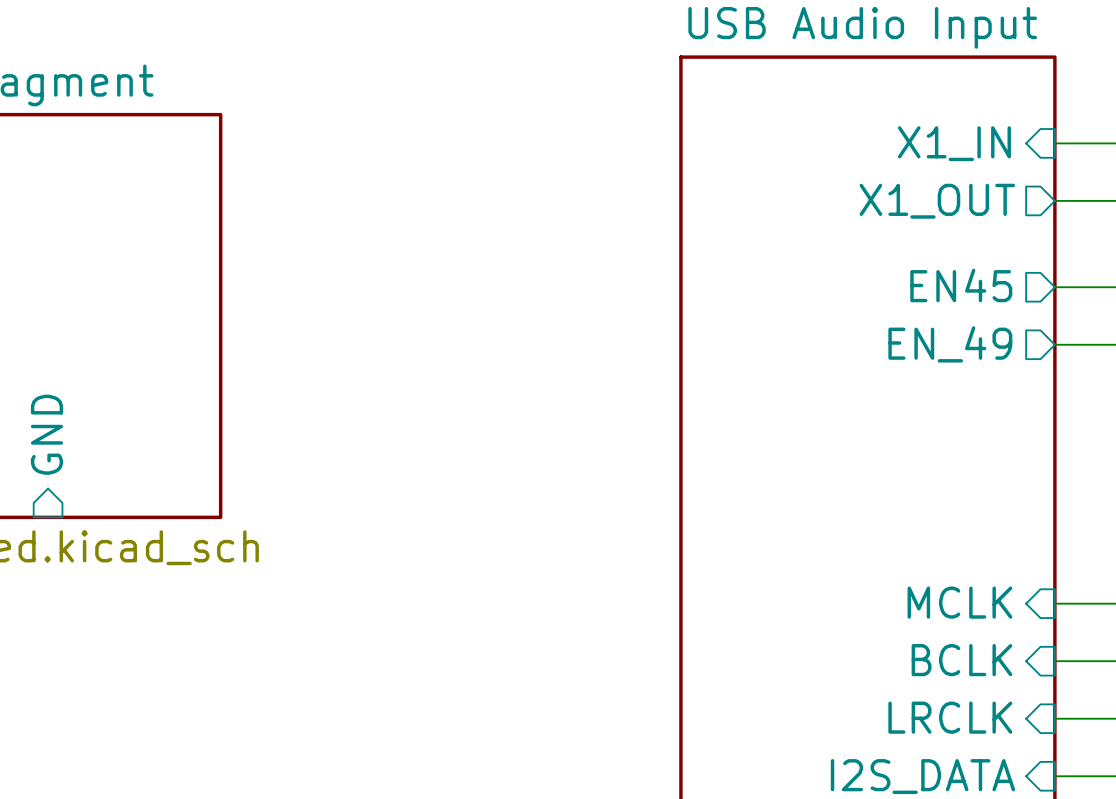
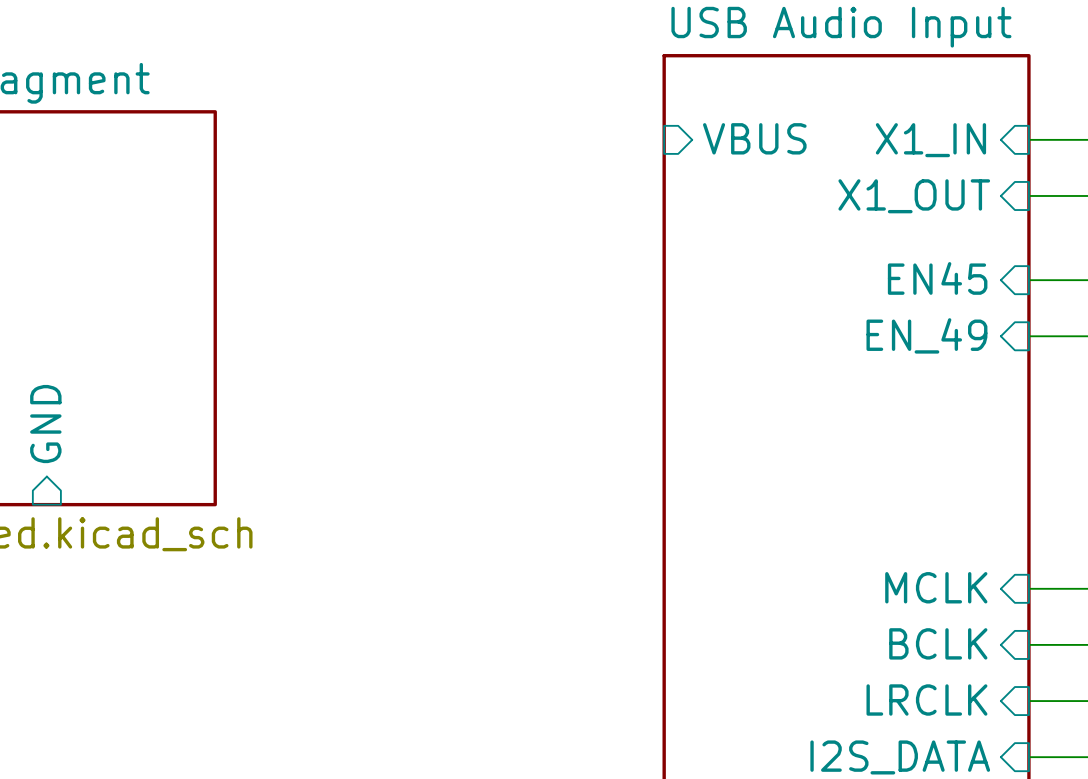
sheet pin: none -> VBUS (754, 138)
sheet pin shape: output (937, 201) -> input (914, 196)
sheet pin shape: output (961, 285) -> input (937, 278)
sheet pin shape: output (950, 344) -> input (926, 335)

